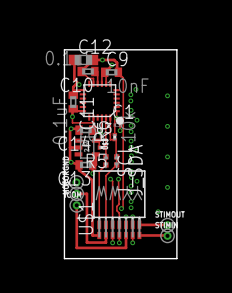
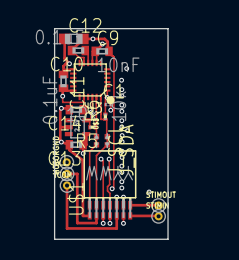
via: (130, 94) -> none
via: (167, 95) -> none
via: (136, 120) -> none
via: (167, 126) -> none
via: (167, 156) -> none
via: (136, 181) -> none
via: (167, 187) -> none

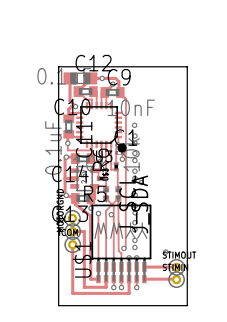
via: (126, 68) -> none
via: (122, 135) -> none
track: (96, 144) (89, 151) (89, 157) -> (106, 198) (113, 206) (113, 217)
track: (109, 159) (109, 184) (107, 190) -> (118, 198) (118, 250)
via position: (109, 159) -> (98, 213)

